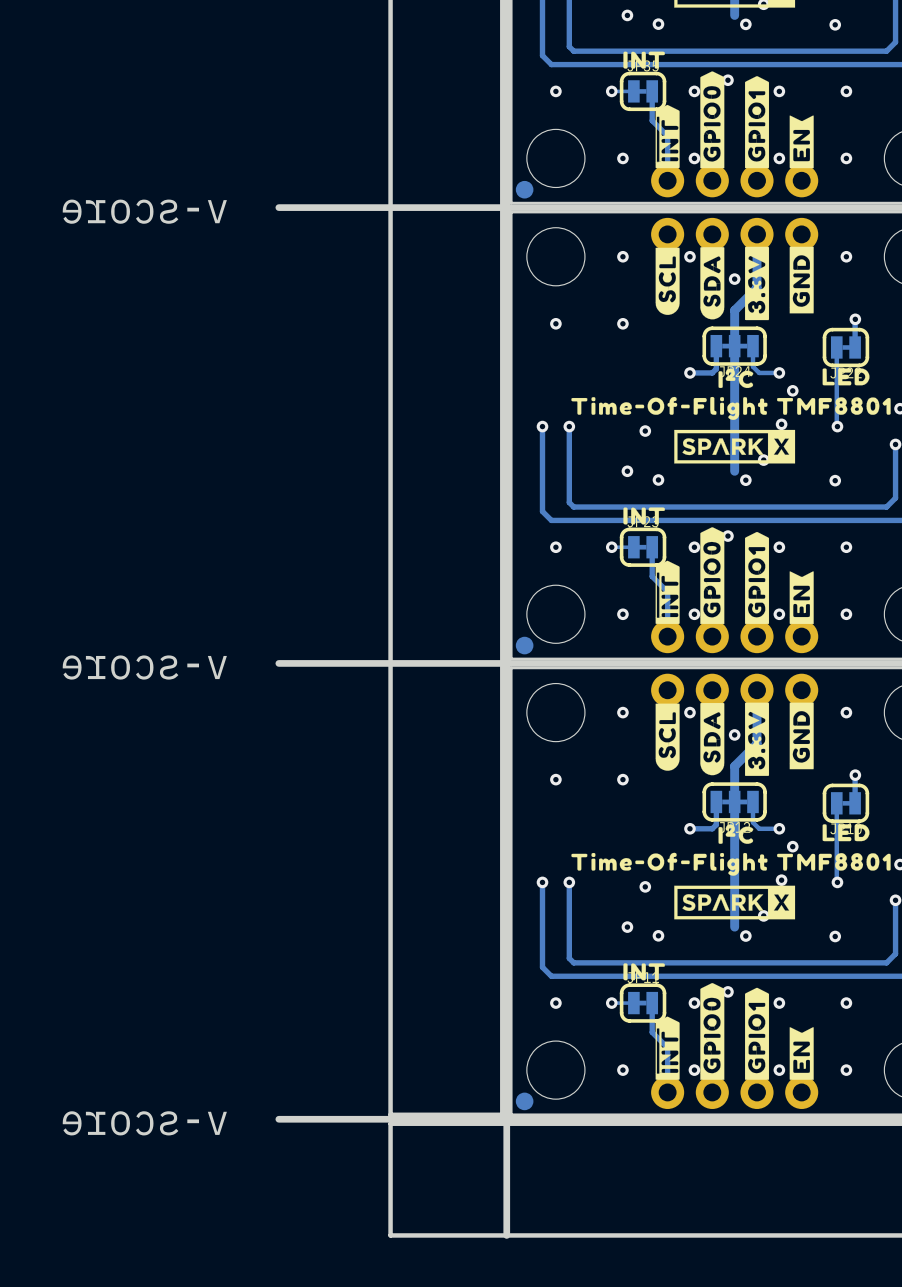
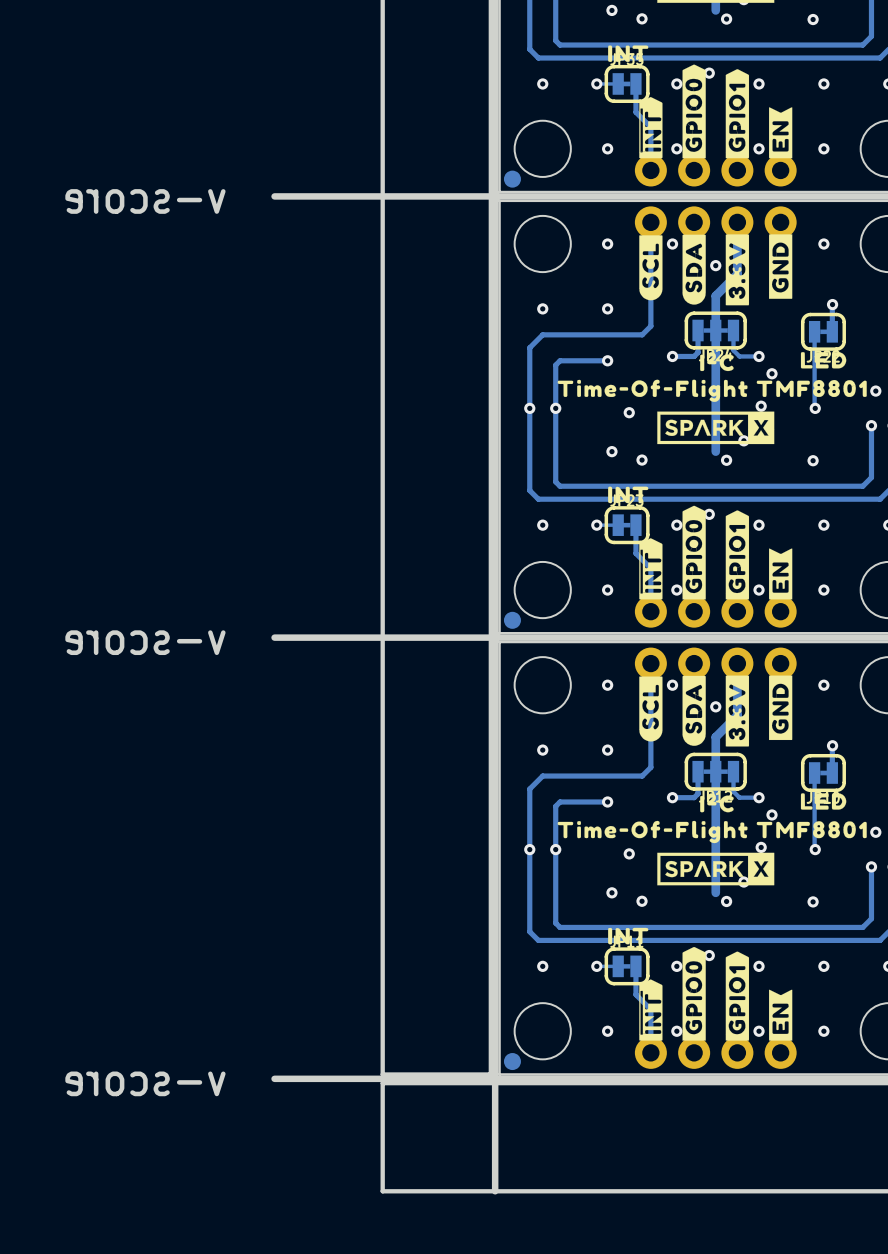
track: none -> (650, 222) (650, 326) (642, 334) (542, 334) (529, 347) (529, 408)
track: none -> (607, 360) (560, 360) (555, 365) (555, 408)
via: none -> (607, 360)
track: none -> (650, 663) (650, 767) (642, 776) (542, 776) (529, 789) (529, 849)
track: none -> (607, 801) (560, 801) (555, 806) (555, 849)
via: none -> (607, 801)

